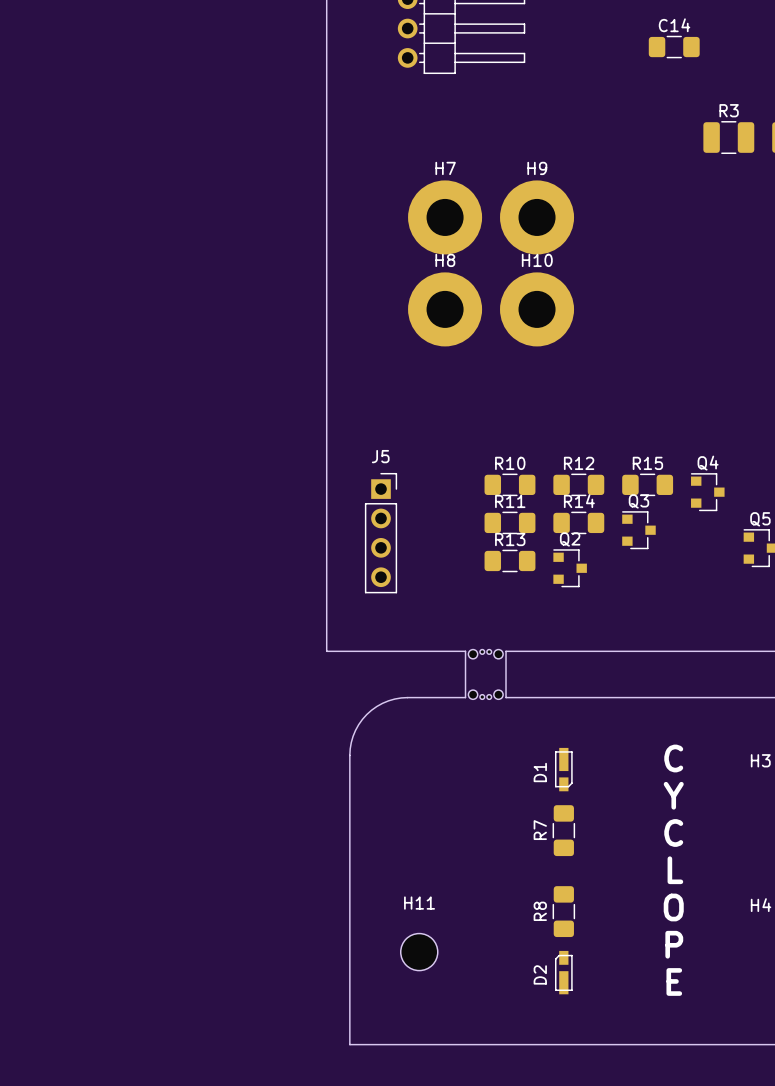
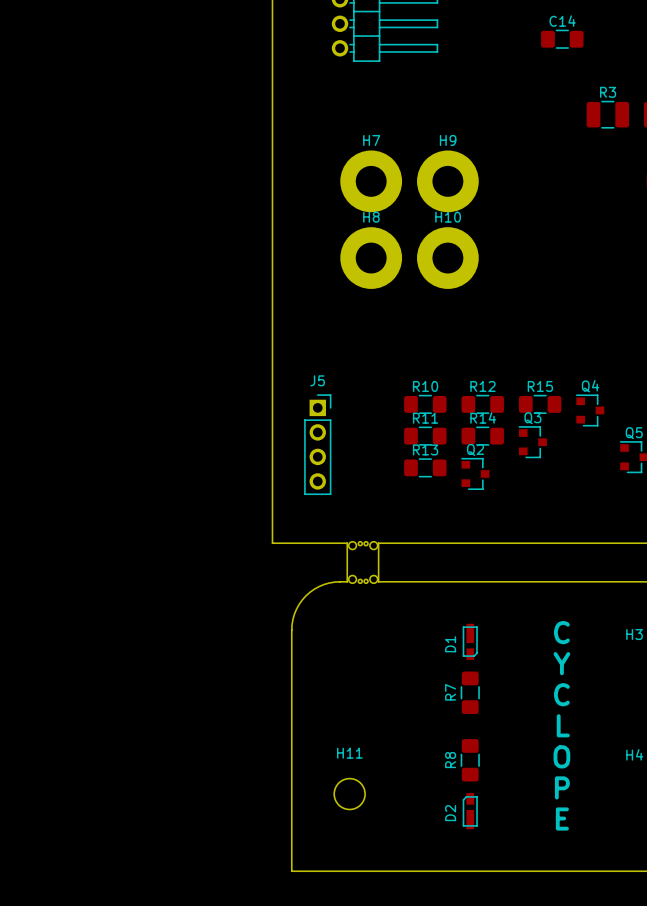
board edge: (416, 651) (453, 651) -> (347, 543) (347, 581)
board edge: (465, 651) (465, 697) -> (388, 543) (422, 543)
board edge: (506, 651) (506, 697) -> (388, 581) (422, 581)
part: none -> (363, 545)
part: (485, 654) -> none
part: none -> (363, 579)
part: (485, 694) -> none
board edge: (416, 697) (453, 697) -> (378, 543) (378, 581)

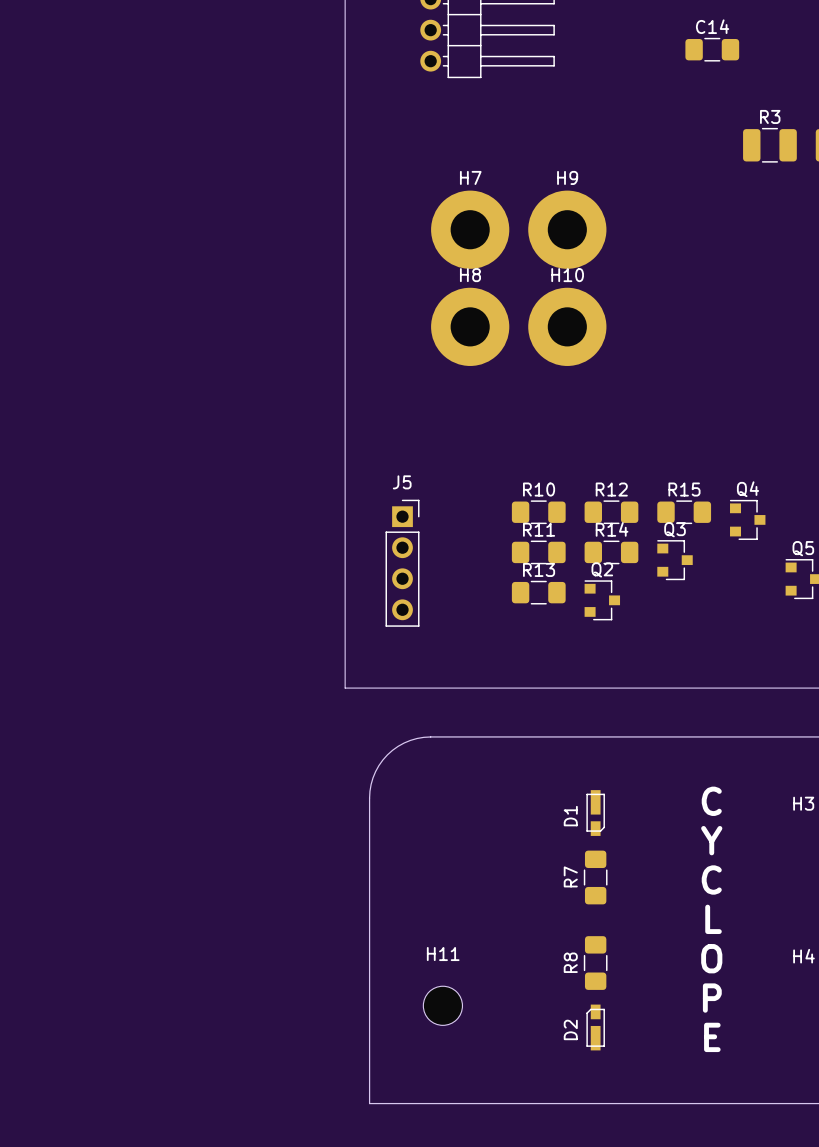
board edge: (347, 543) (347, 581) -> (439, 688) (479, 688)
board edge: (378, 543) (378, 581) -> (439, 736) (479, 736)
part: (363, 545) -> none
part: (363, 579) -> none

